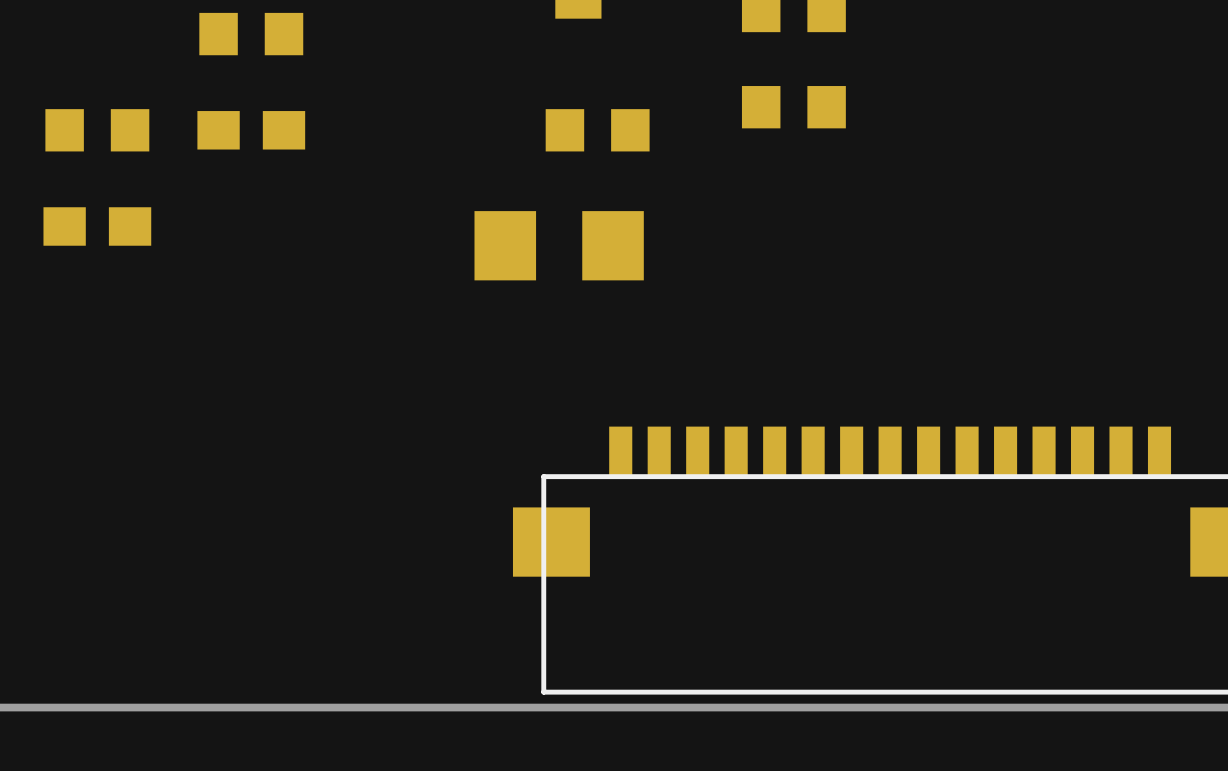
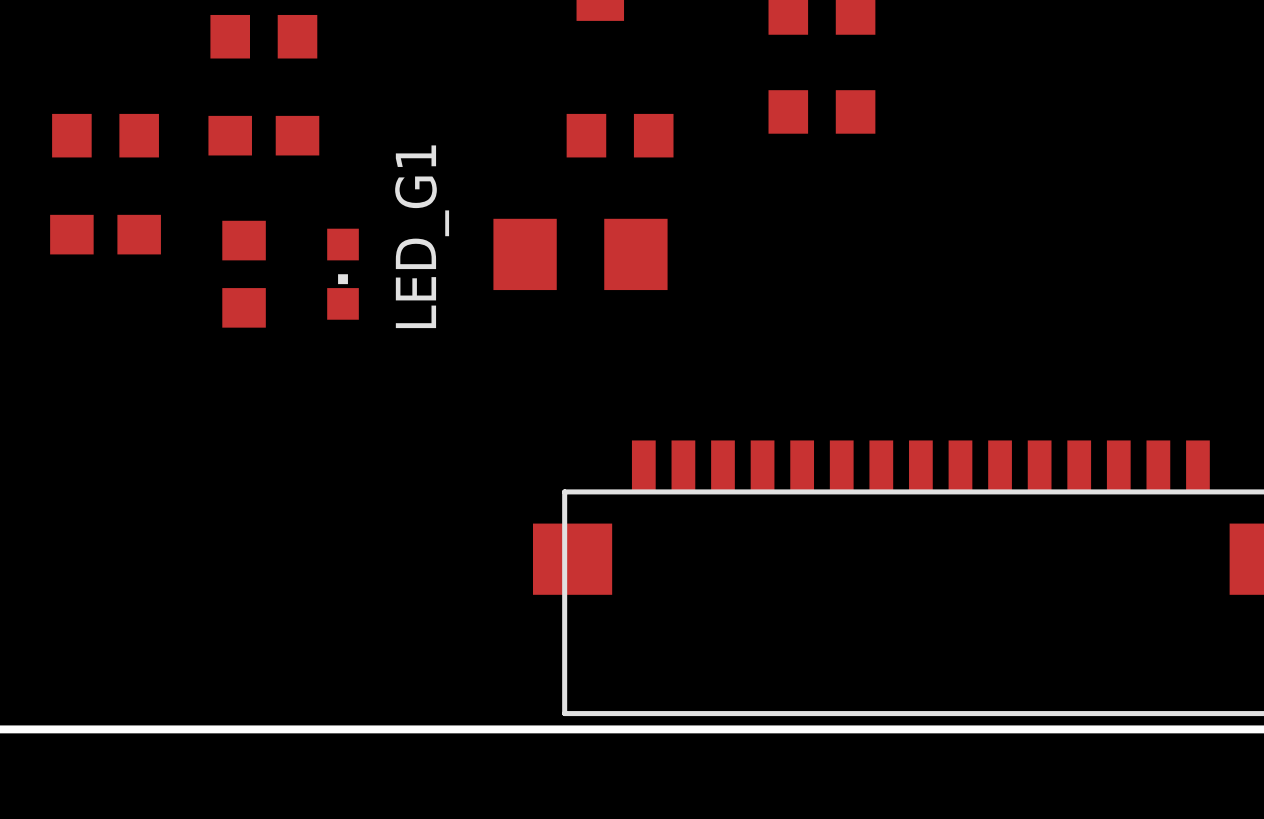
part: none -> (244, 274)
LED_G1: none -> (343, 274)

